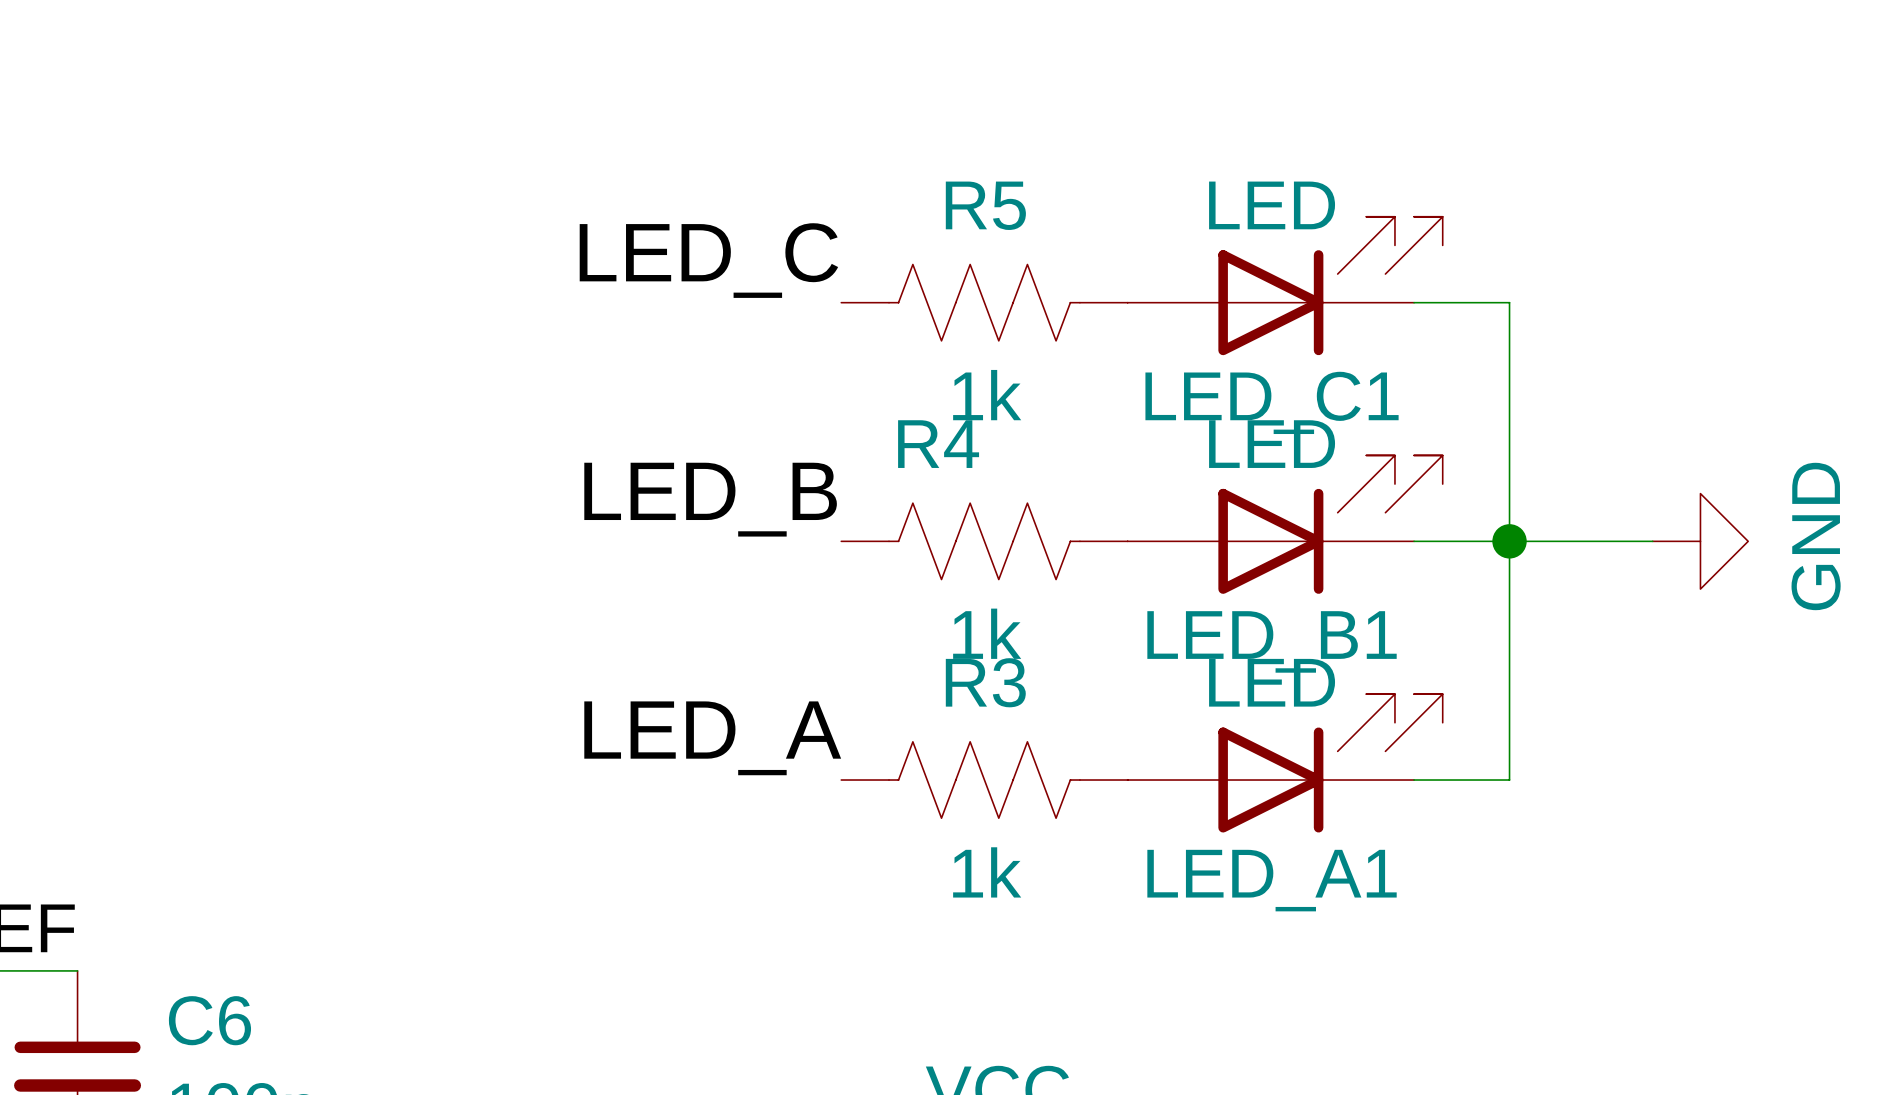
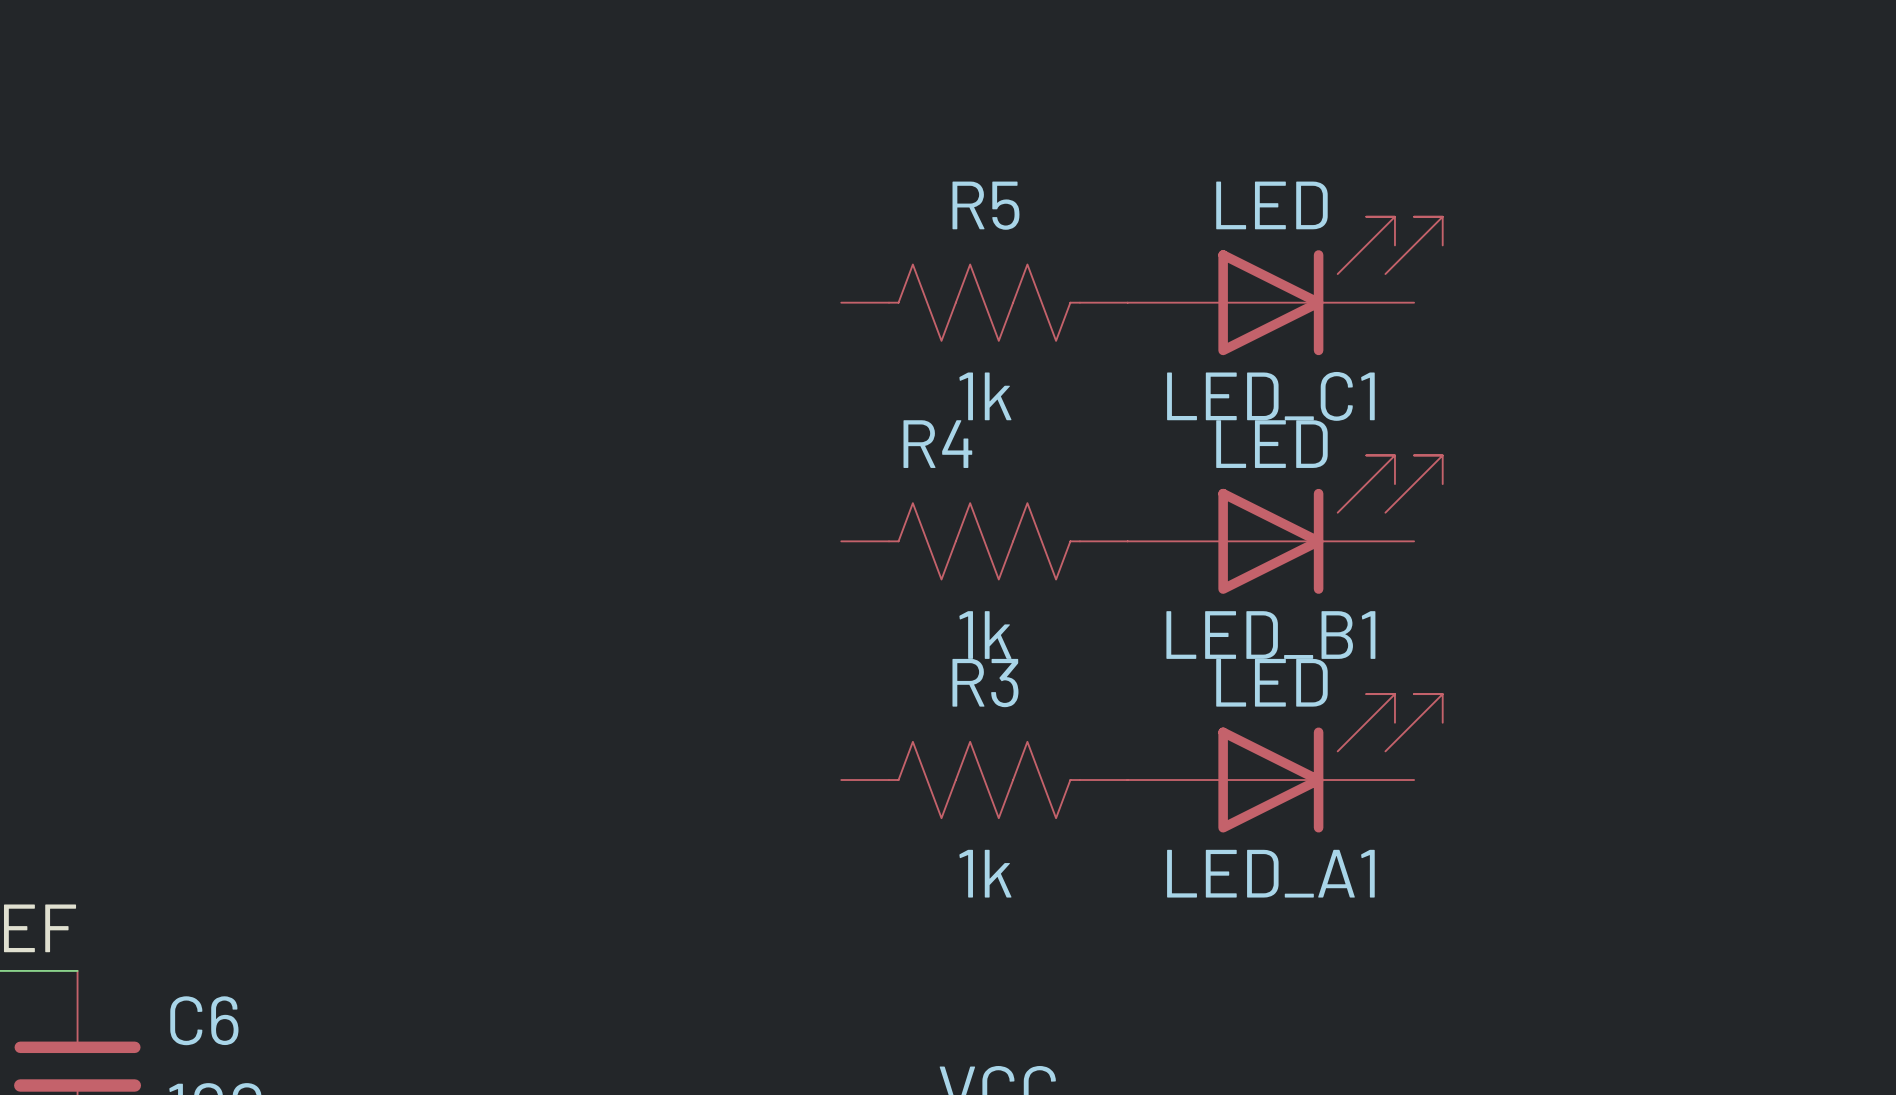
label: LED_C (708, 260) -> none
wire: (1414, 302) (1509, 302) (1509, 780) (1414, 780) -> none
label: LED_B (710, 499) -> none
wire: (1414, 541) (1652, 541) -> none
junction: (1509, 541) -> none
power symbol: GND (1700, 541) -> none
label: LED_A (712, 738) -> none

